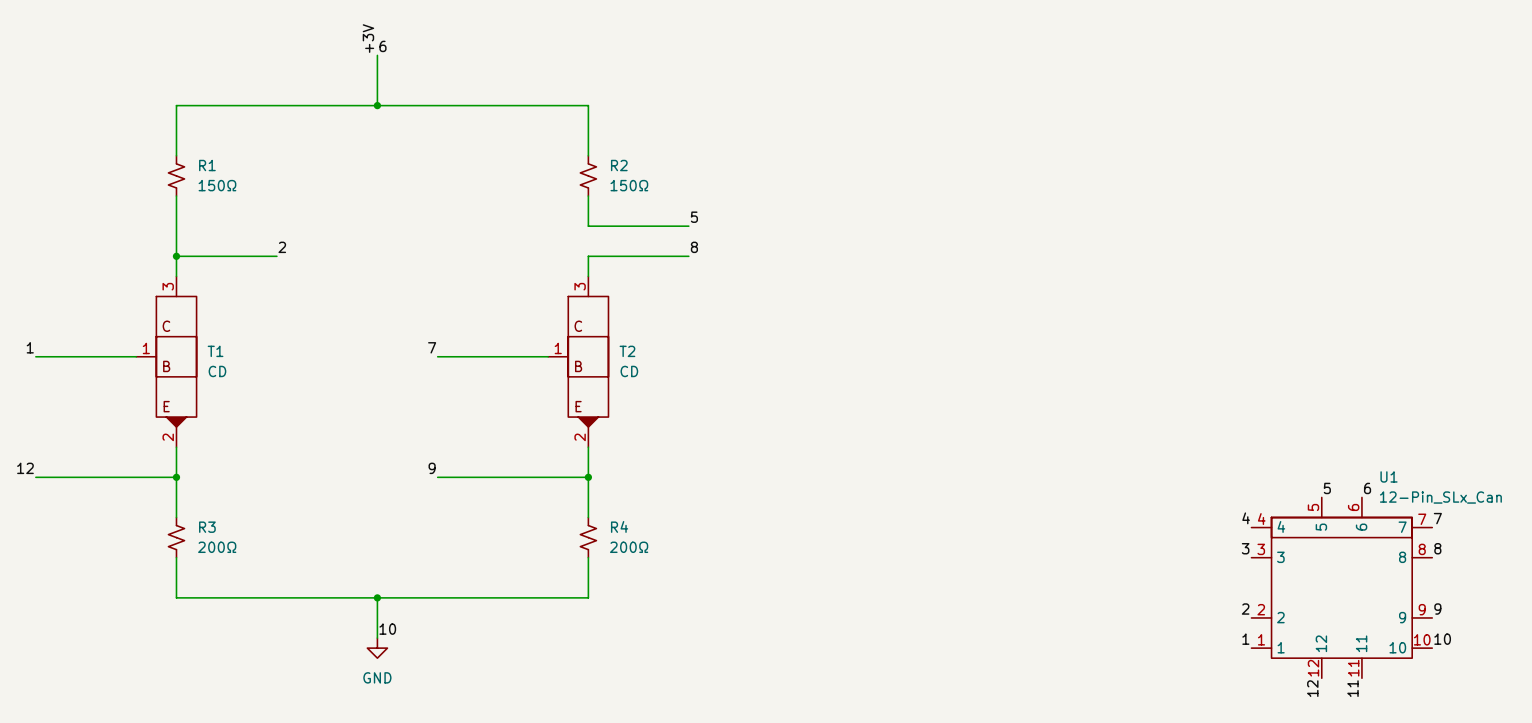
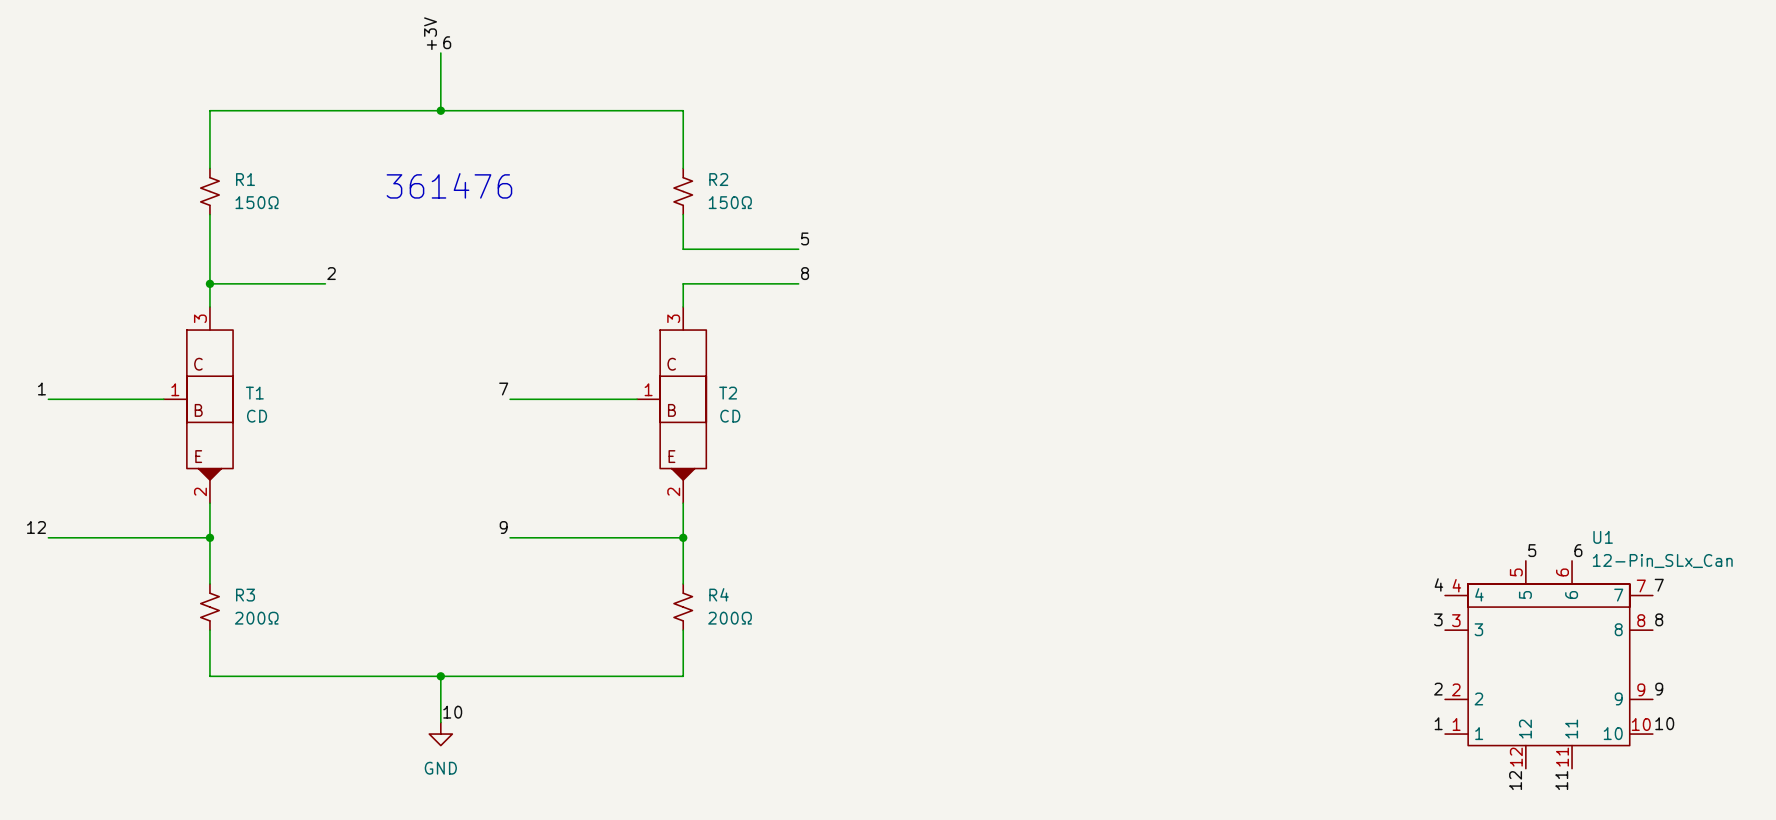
text: none -> 361476 (449, 185)

